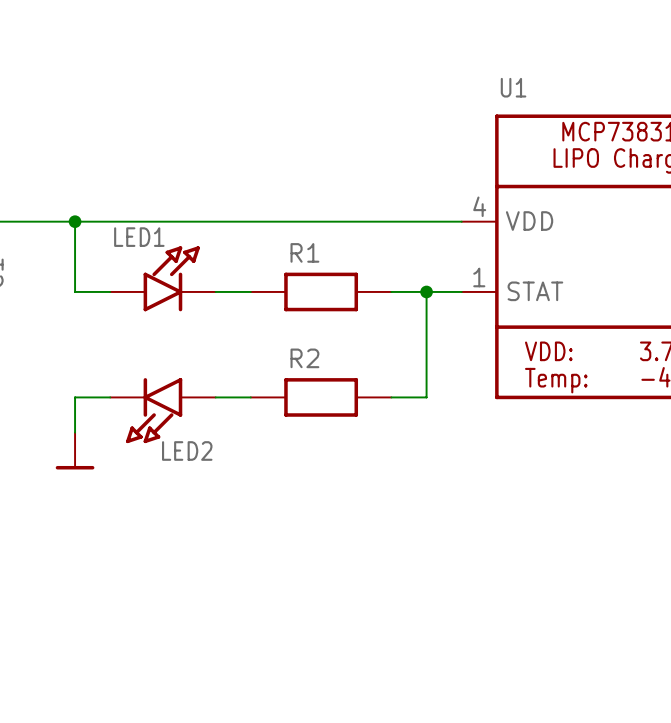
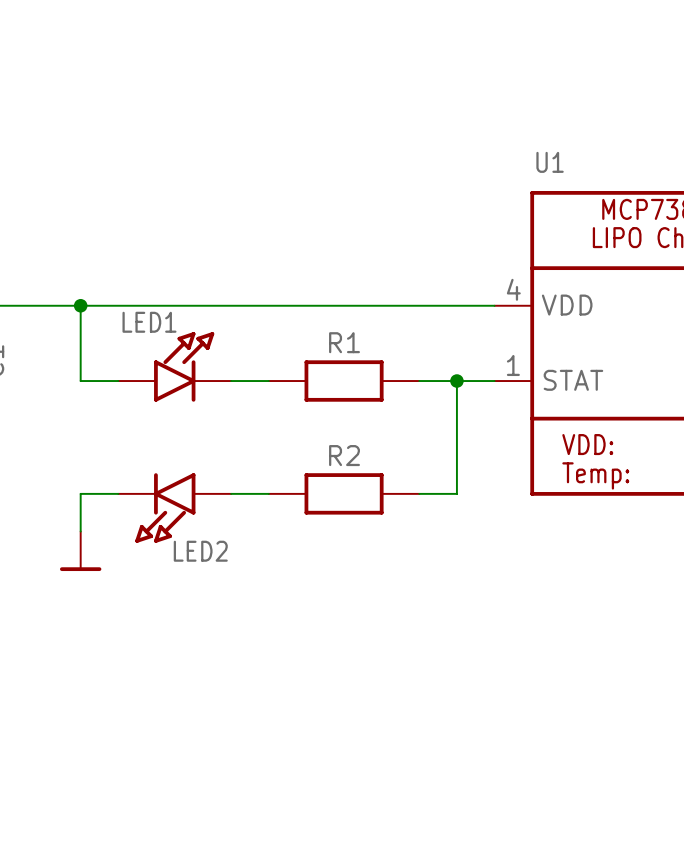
R1 name position: R1 (304, 252) -> R1 (344, 342)
R2 name position: R2 (304, 358) -> R2 (344, 455)

